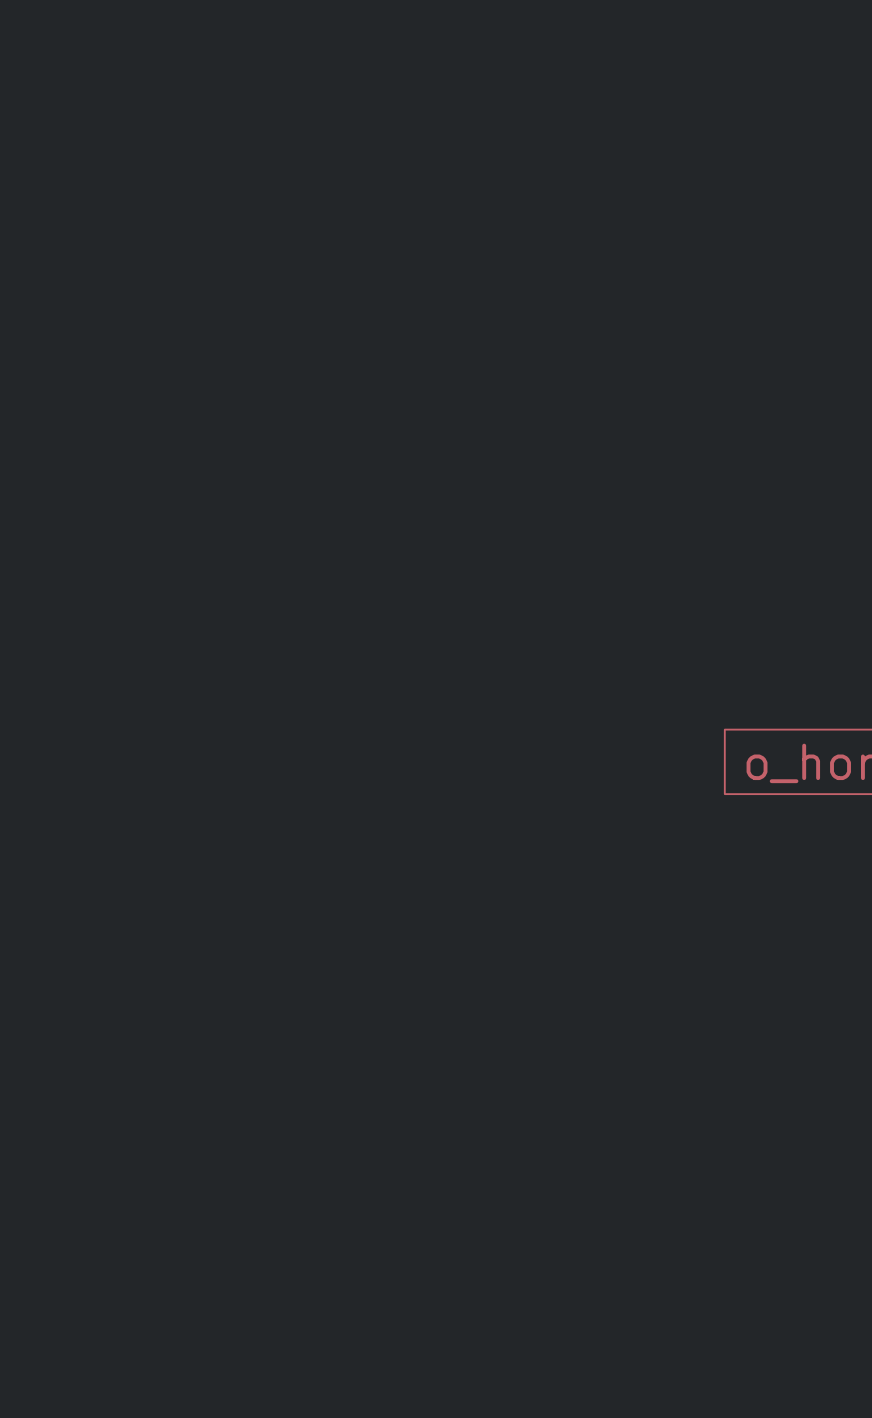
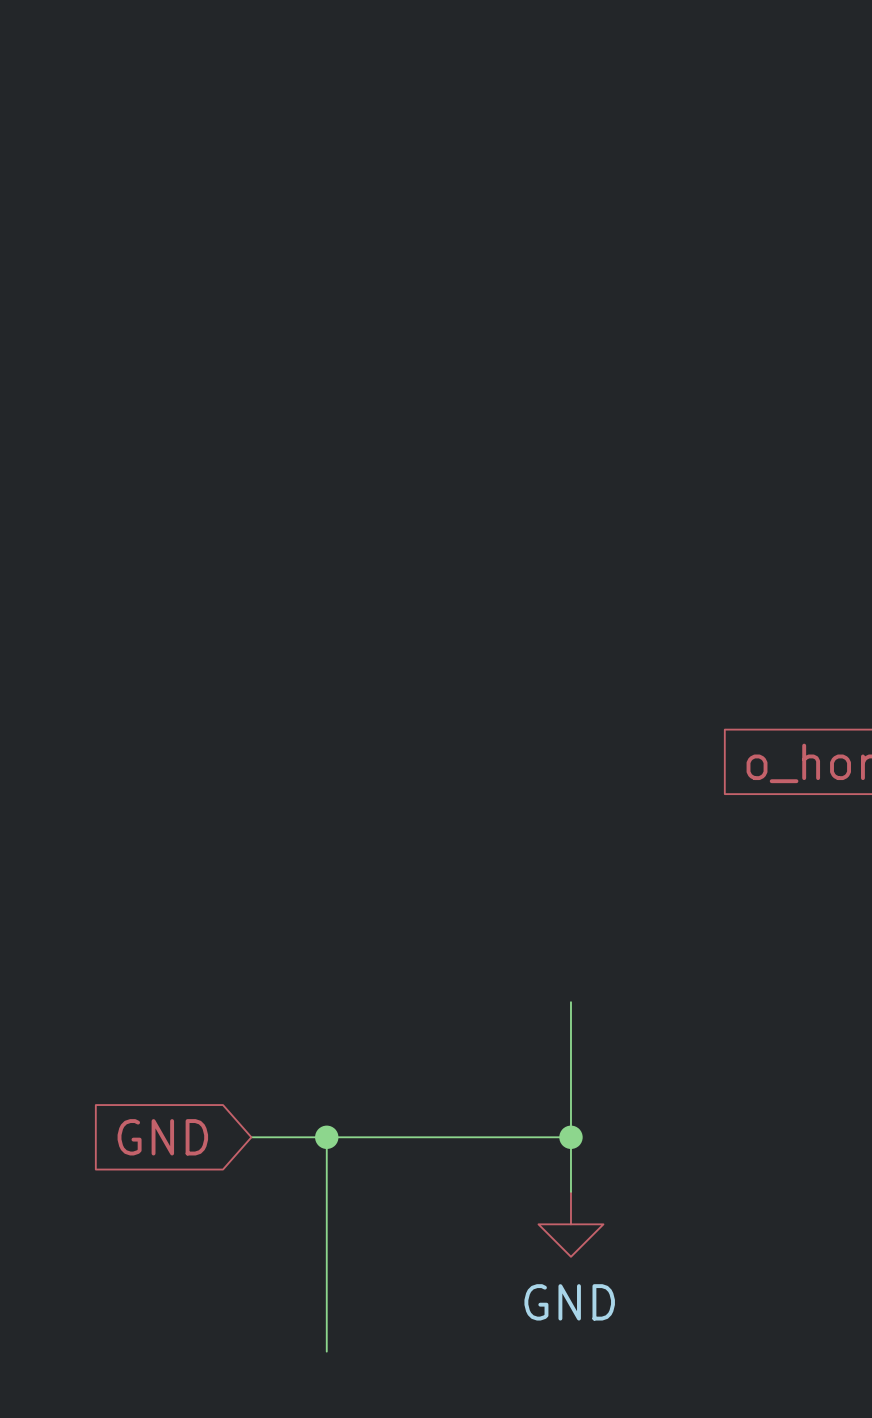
wire: none -> (570, 1002) (570, 1191)
global label: none -> GND (162, 1137)
wire: none -> (251, 1137) (570, 1137)
wire: none -> (326, 1137) (326, 1351)
junction: none -> (326, 1137)
junction: none -> (570, 1137)
power symbol: none -> GND (570, 1224)

